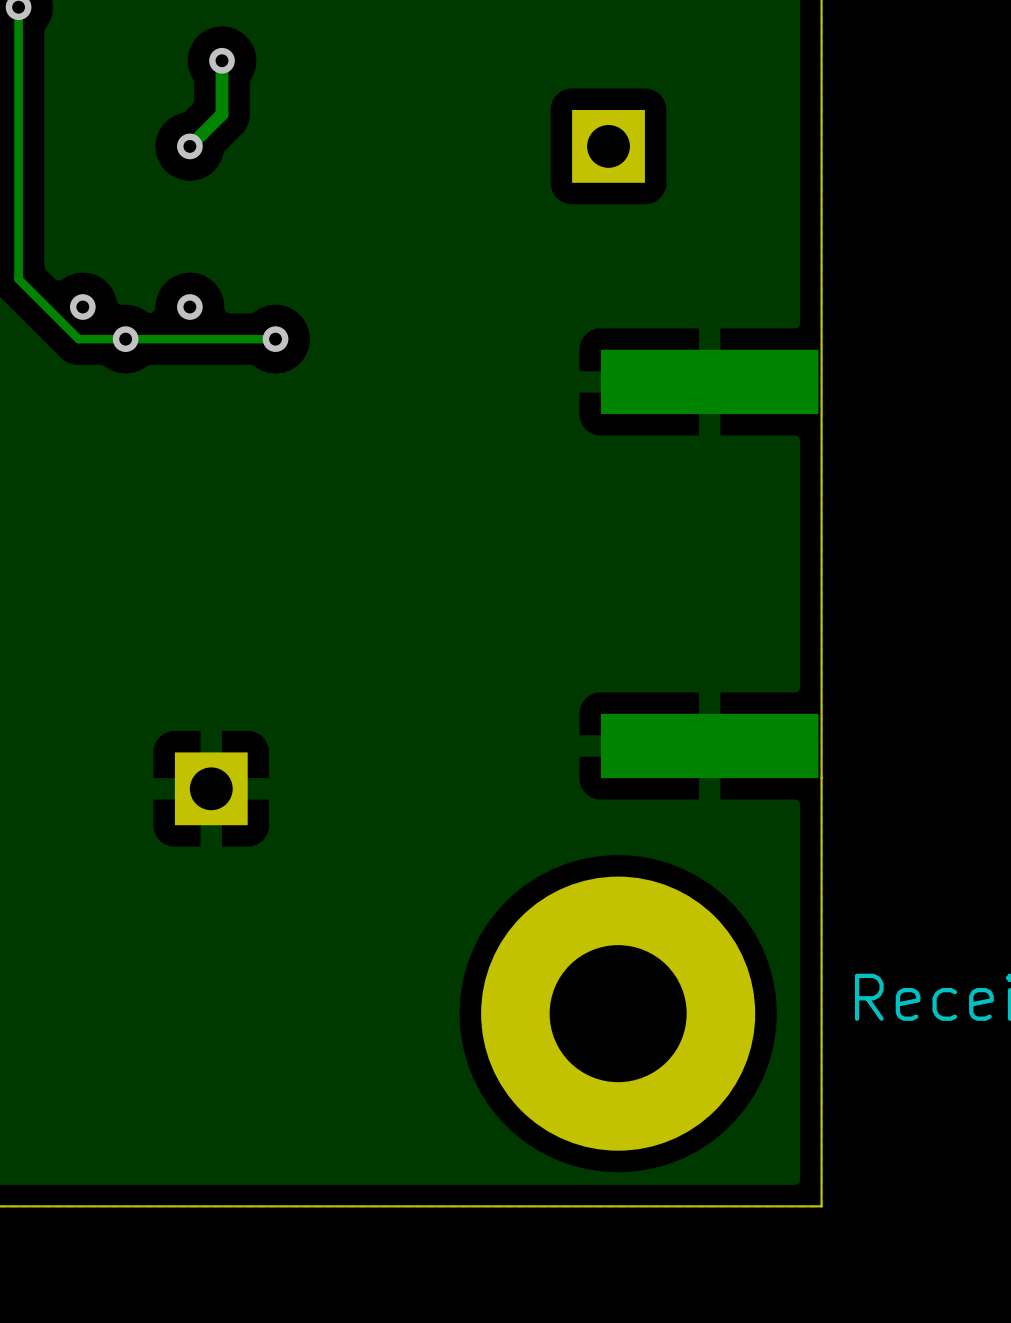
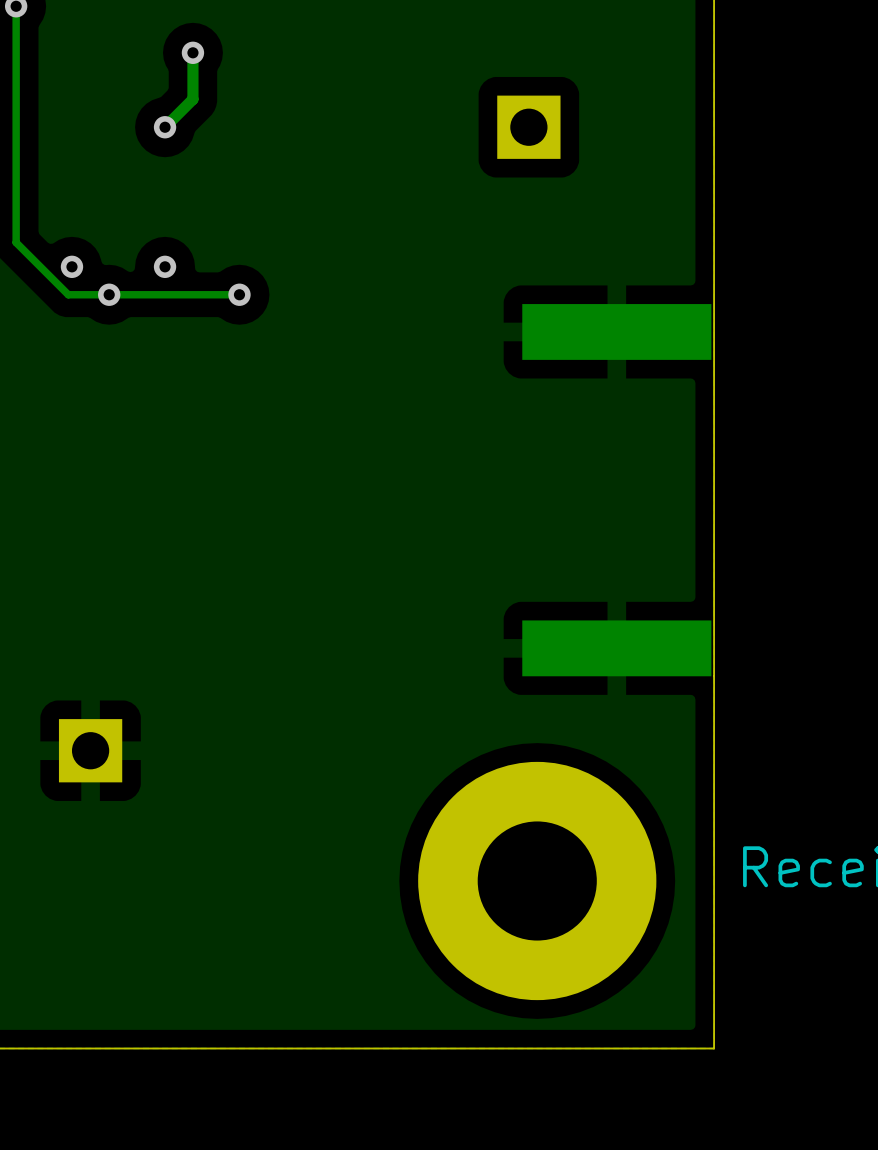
part position: (211, 788) -> (90, 750)

